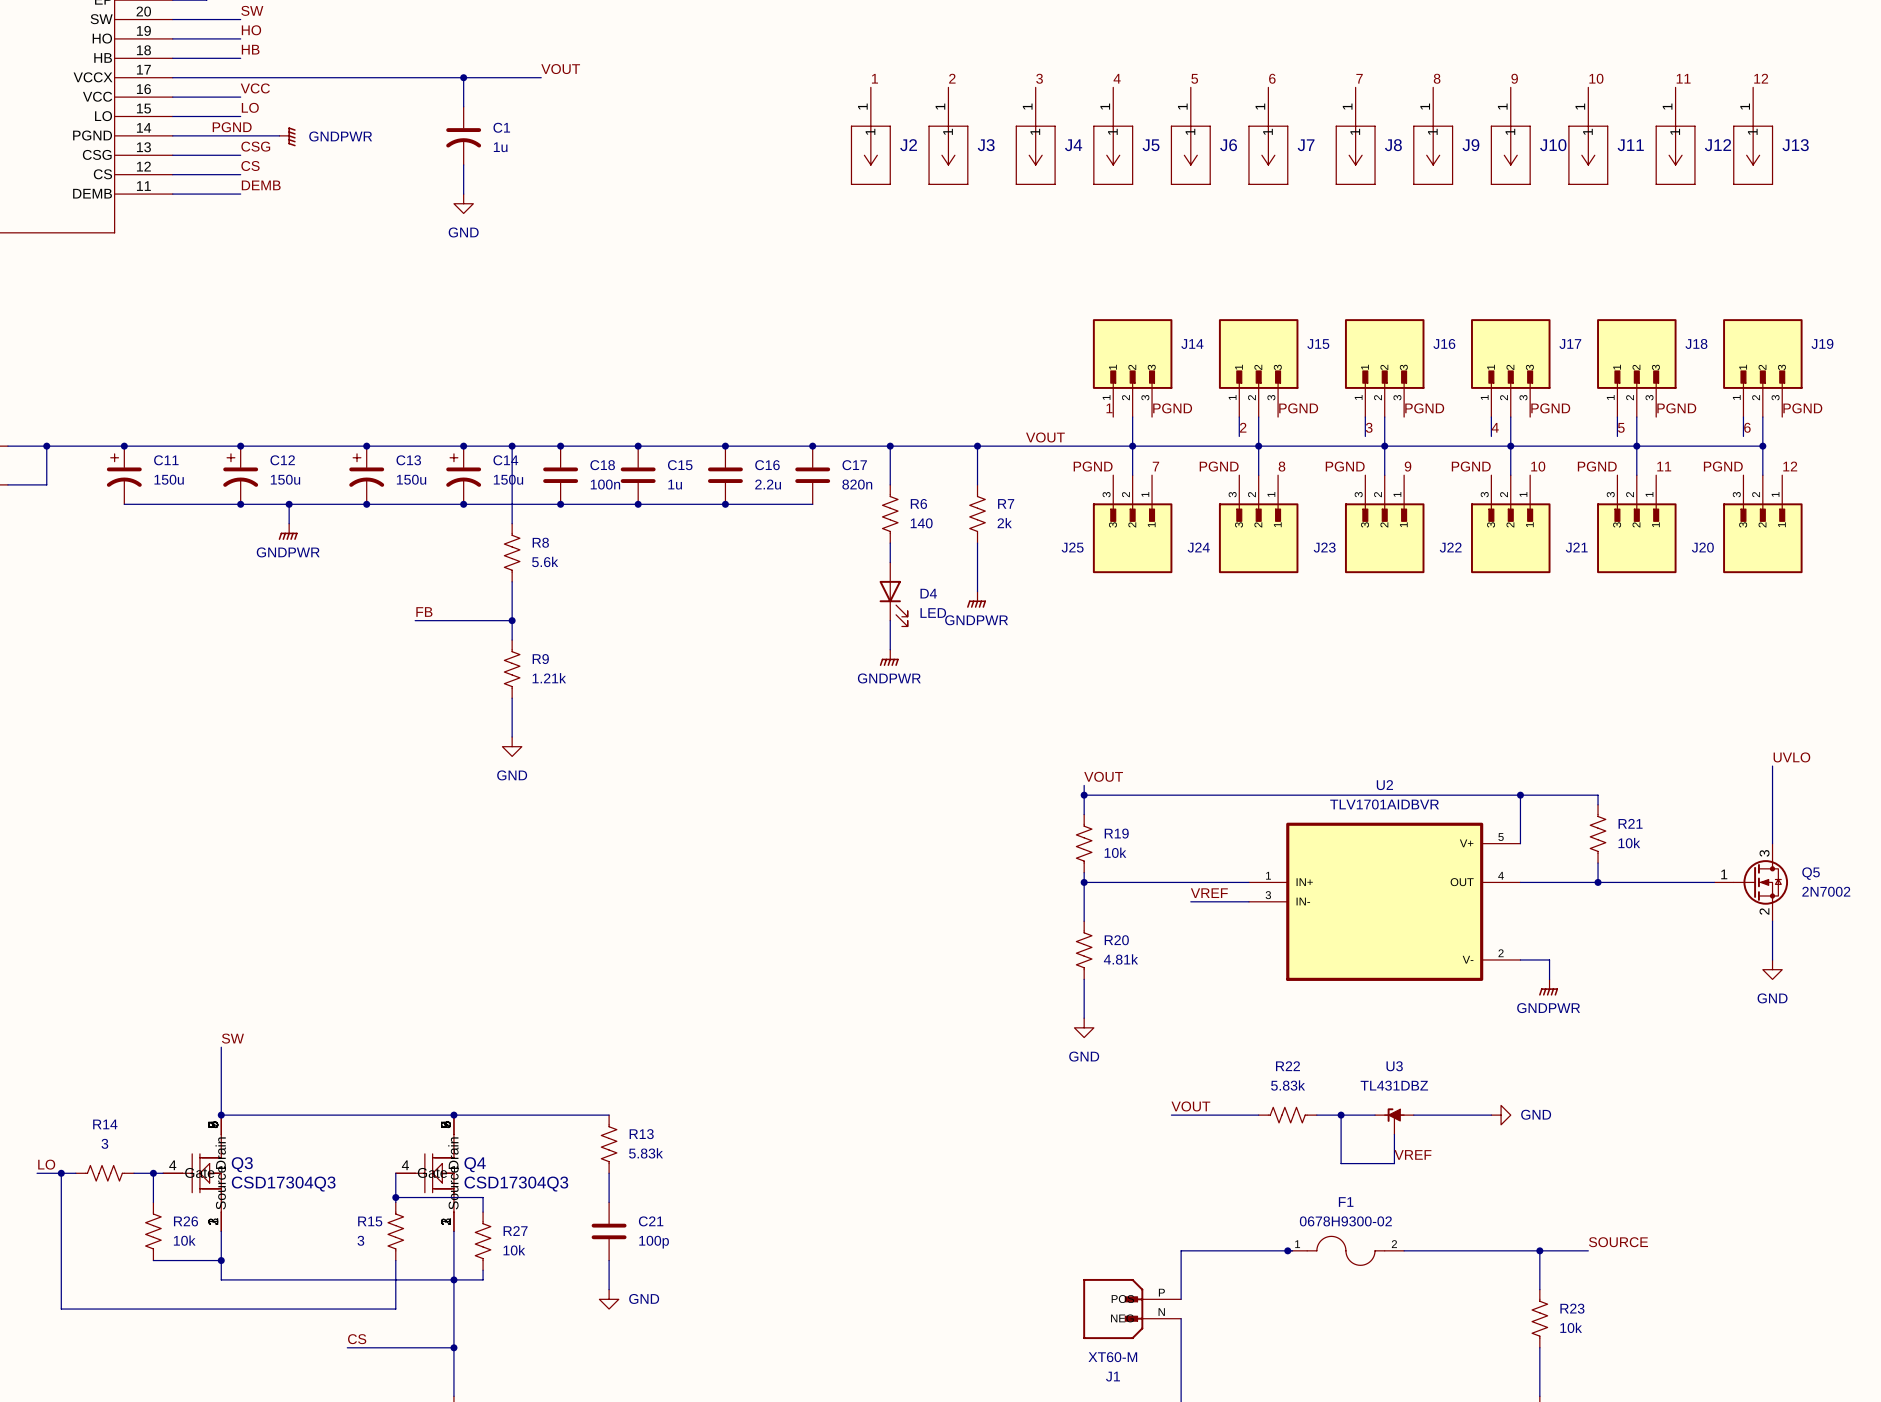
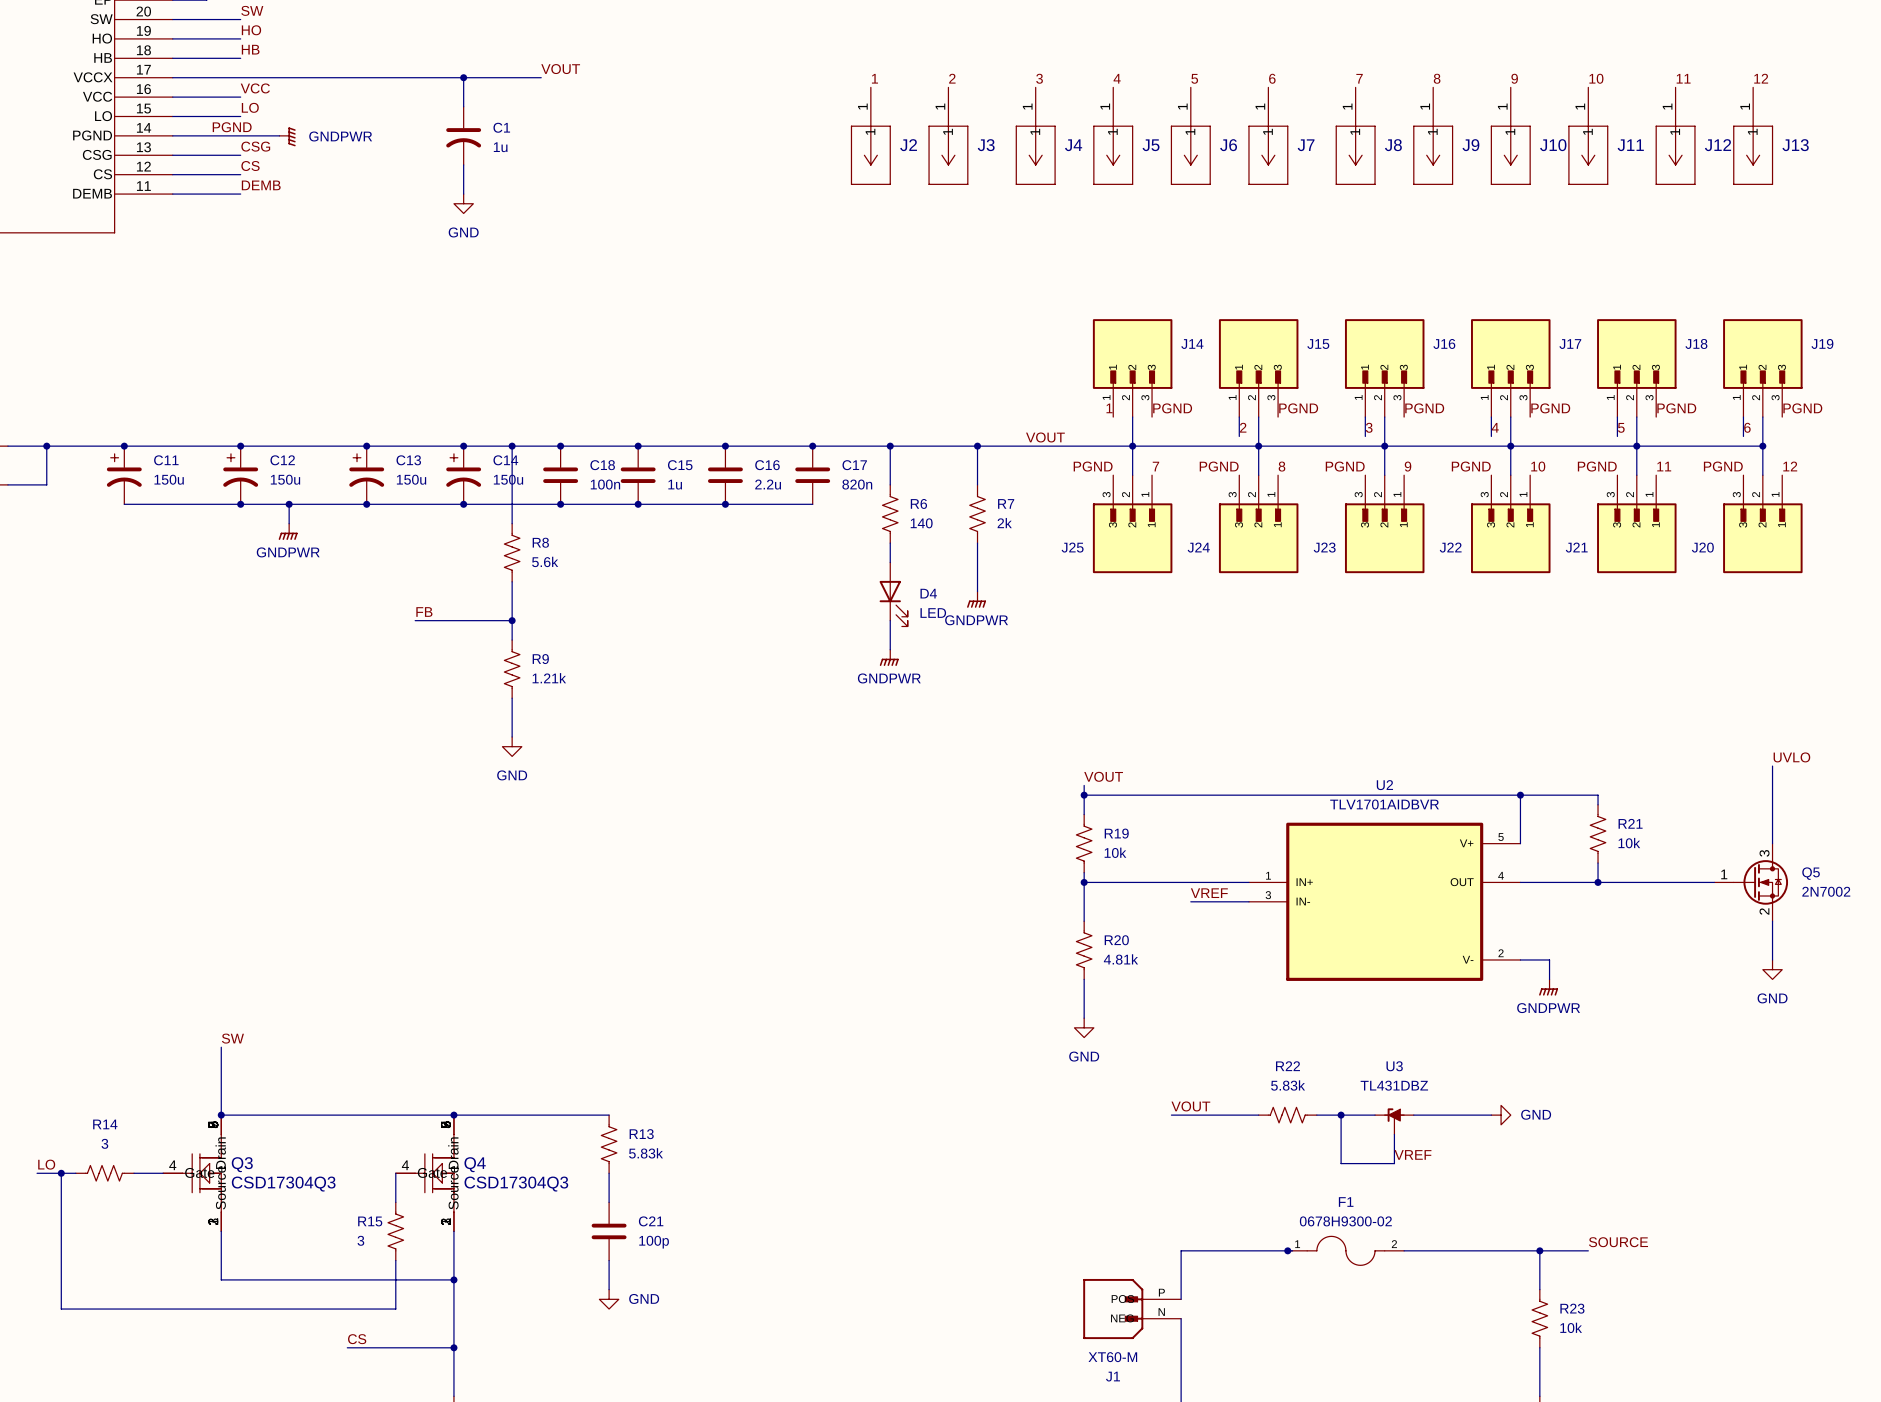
wire: (153, 1173) (153, 1202) -> none
junction: (153, 1173) -> none
wire: (395, 1197) (483, 1197) (483, 1212) -> none
junction: (395, 1197) -> none
R26: 10k (153, 1231) -> none
R27: 10k (483, 1241) -> none
wire: (153, 1260) (221, 1260) -> none
junction: (221, 1260) -> none
wire: (483, 1270) (483, 1279) (453, 1279) -> none

